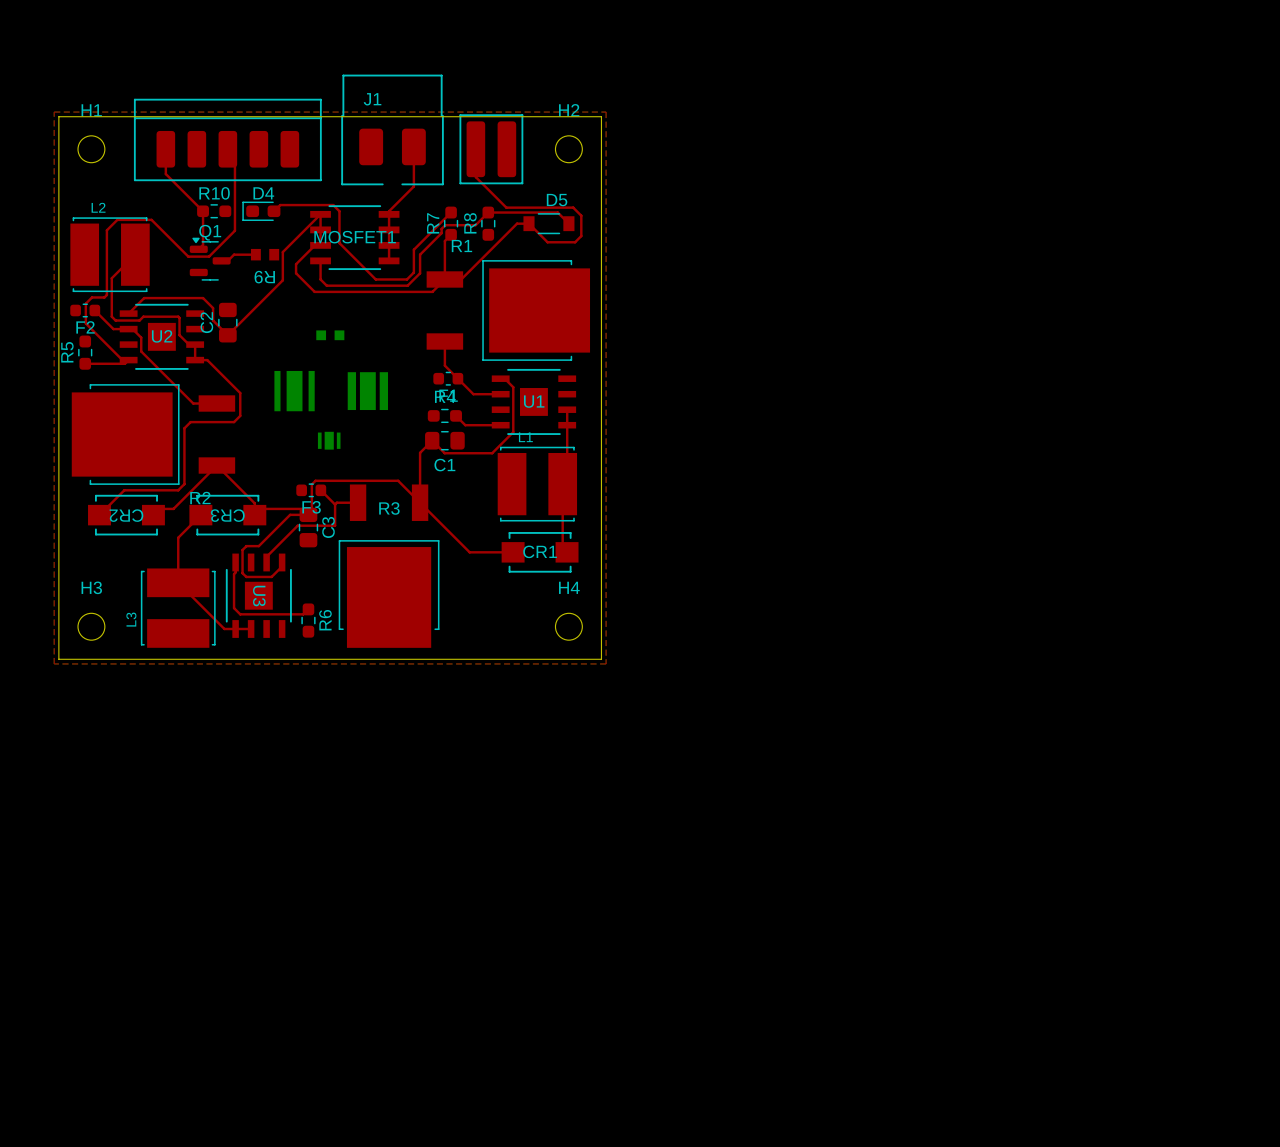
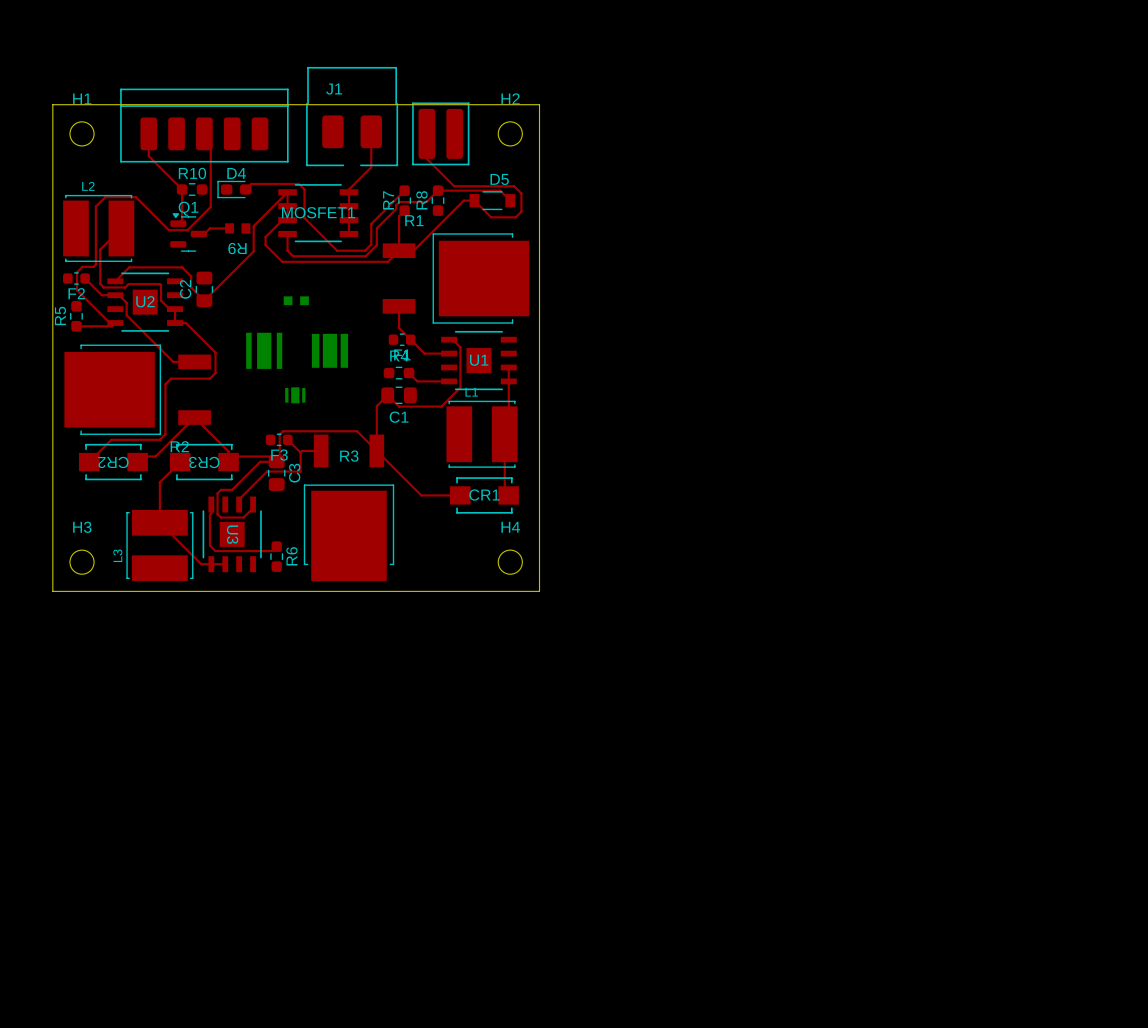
top zone outline: (54, 112) (606, 112) (606, 663) (54, 663) (54, 112) -> none

